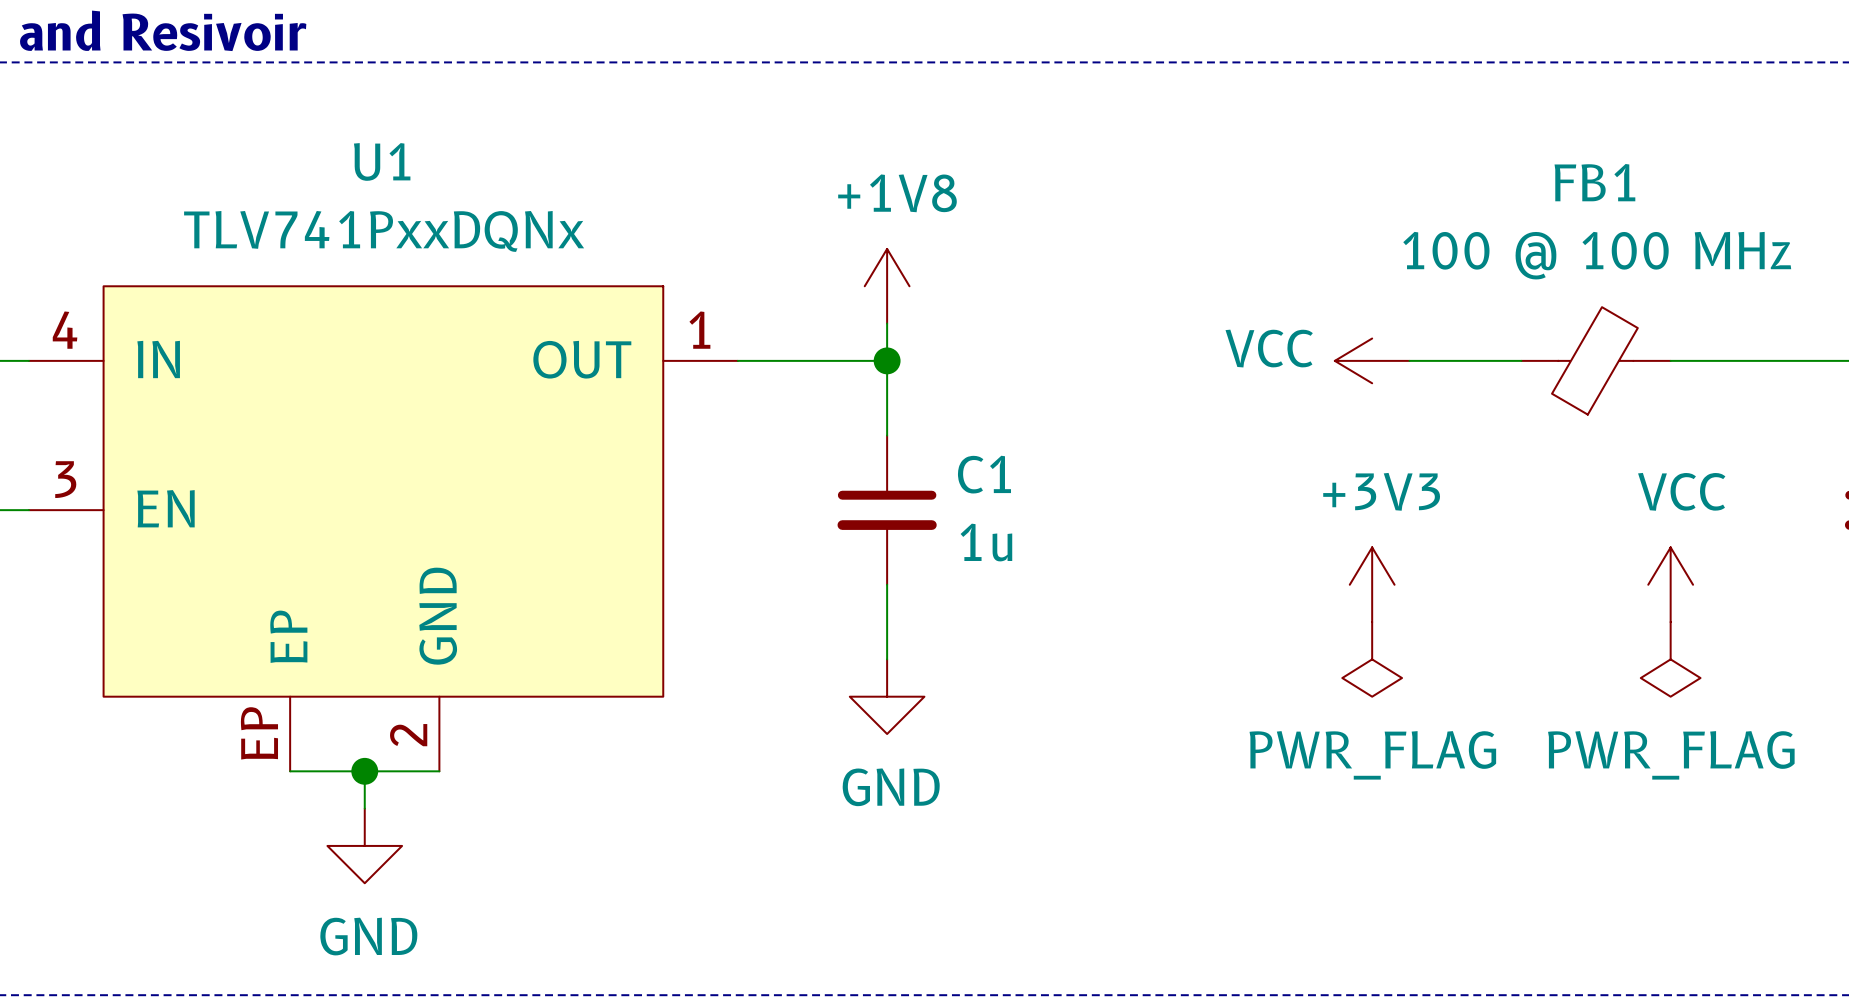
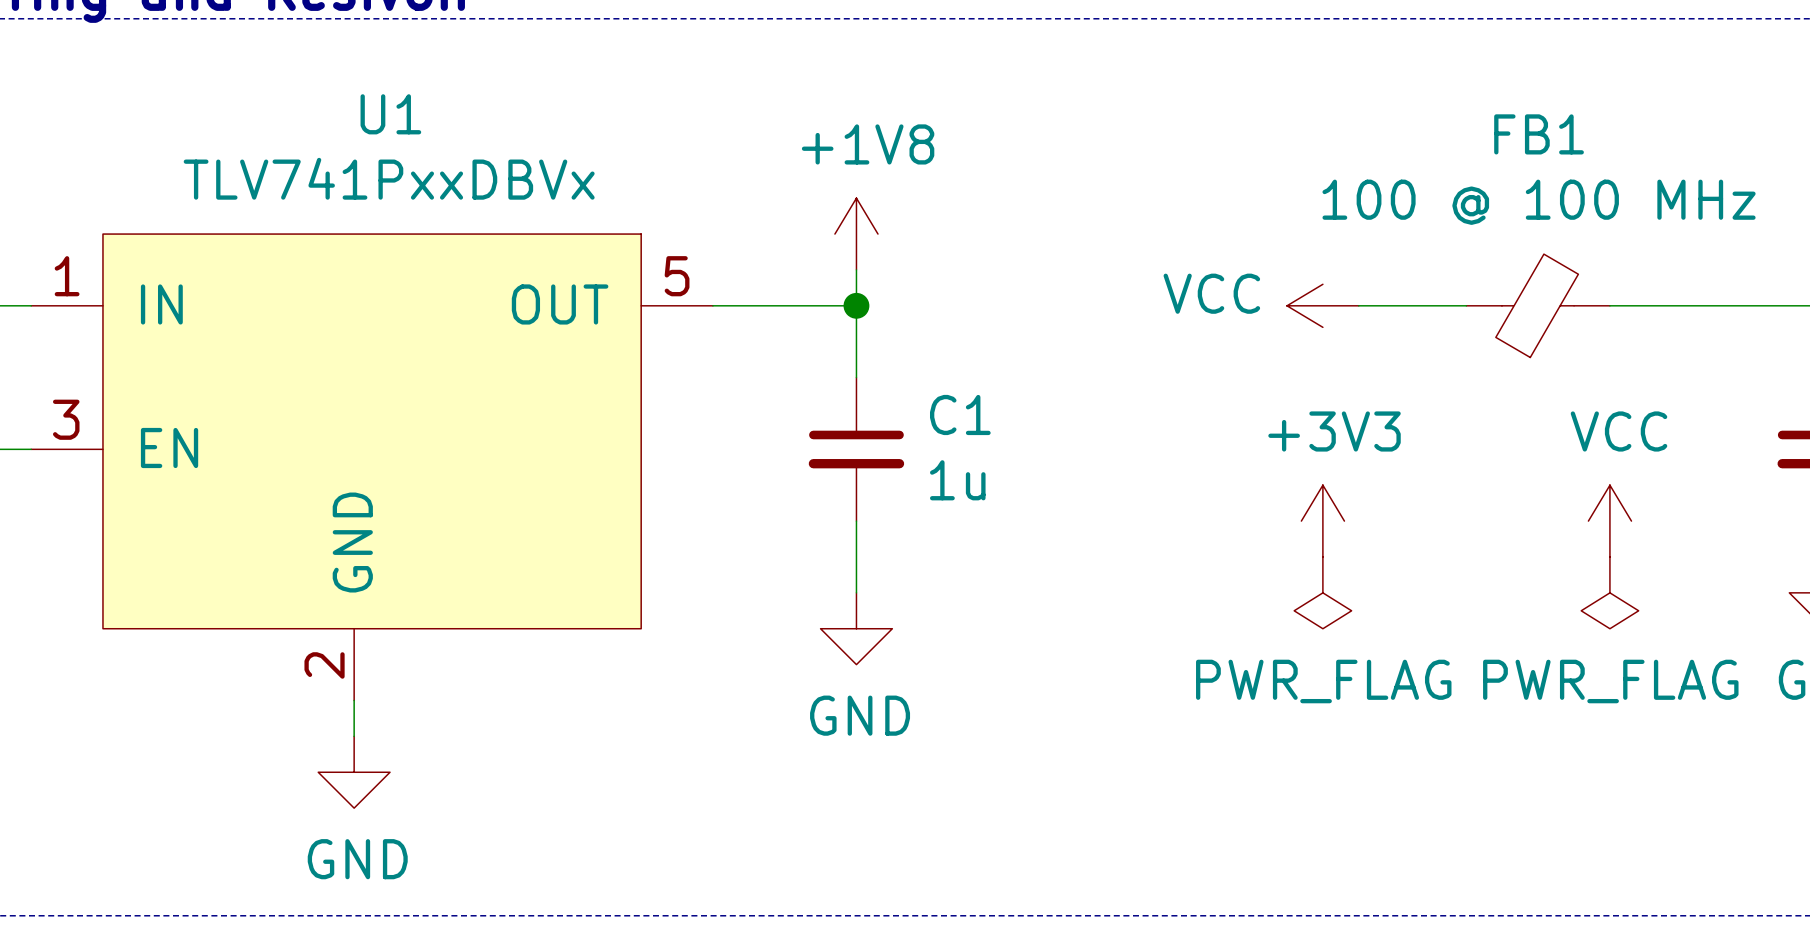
U1 value: TLV741PxxDQNx (384, 231) -> TLV741PxxDBVx (389, 178)
U1 symbol: [28, 286, 738, 772] -> [31, 234, 713, 701]
wire: (290, 771) (439, 771) -> none
junction: (364, 771) -> none

